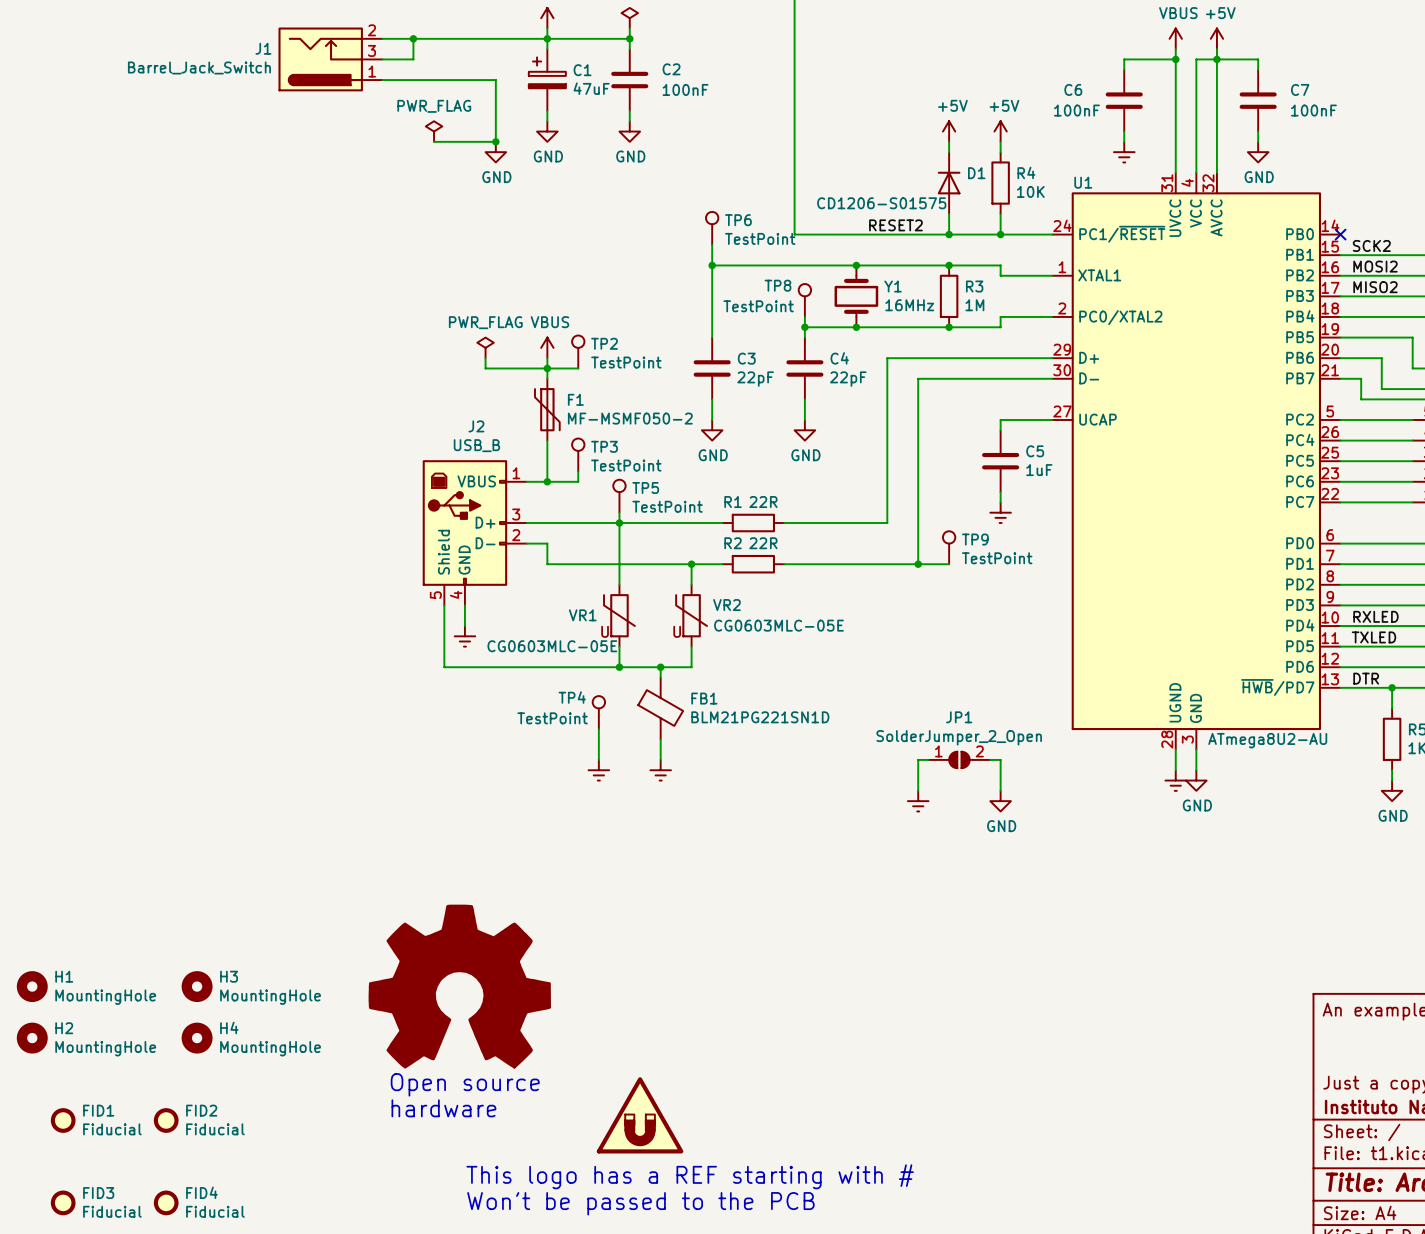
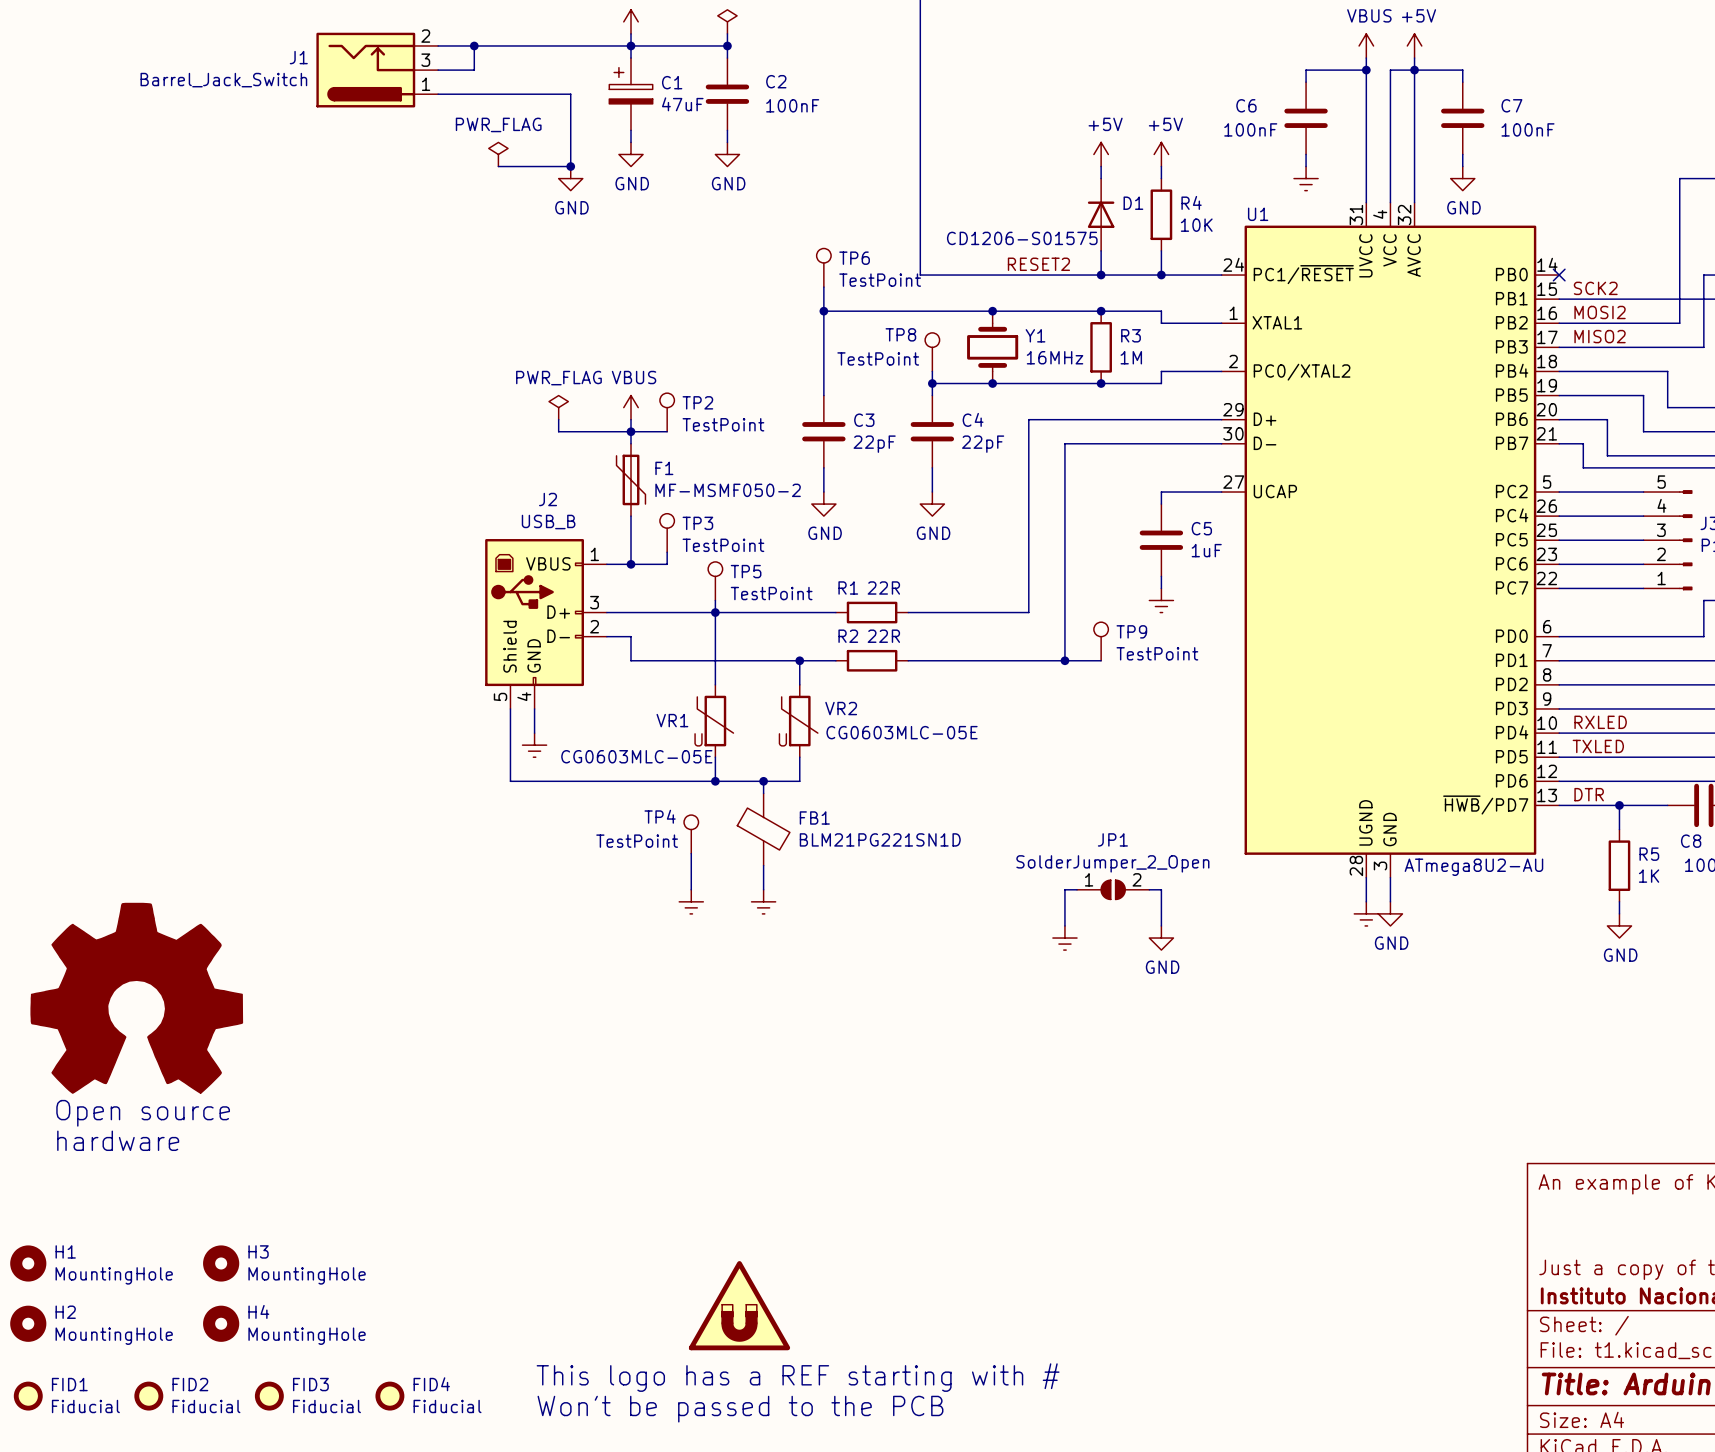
part: none -> (136, 998)
text: none -> Open source (143, 1113)
text: none -> hardware (118, 1140)
H1 position: (32, 986) -> (28, 1263)
H3 position: (197, 986) -> (221, 1263)
part: (459, 986) -> none
H2 position: (32, 1038) -> (28, 1323)
H4 position: (197, 1038) -> (221, 1323)
text: Open source (465, 1084) -> none
text: hardware (443, 1108) -> none
FID1 position: (63, 1120) -> (28, 1396)
FID2 position: (166, 1120) -> (148, 1396)
FID3 position: (63, 1202) -> (269, 1396)
FID4 position: (166, 1202) -> (389, 1396)

